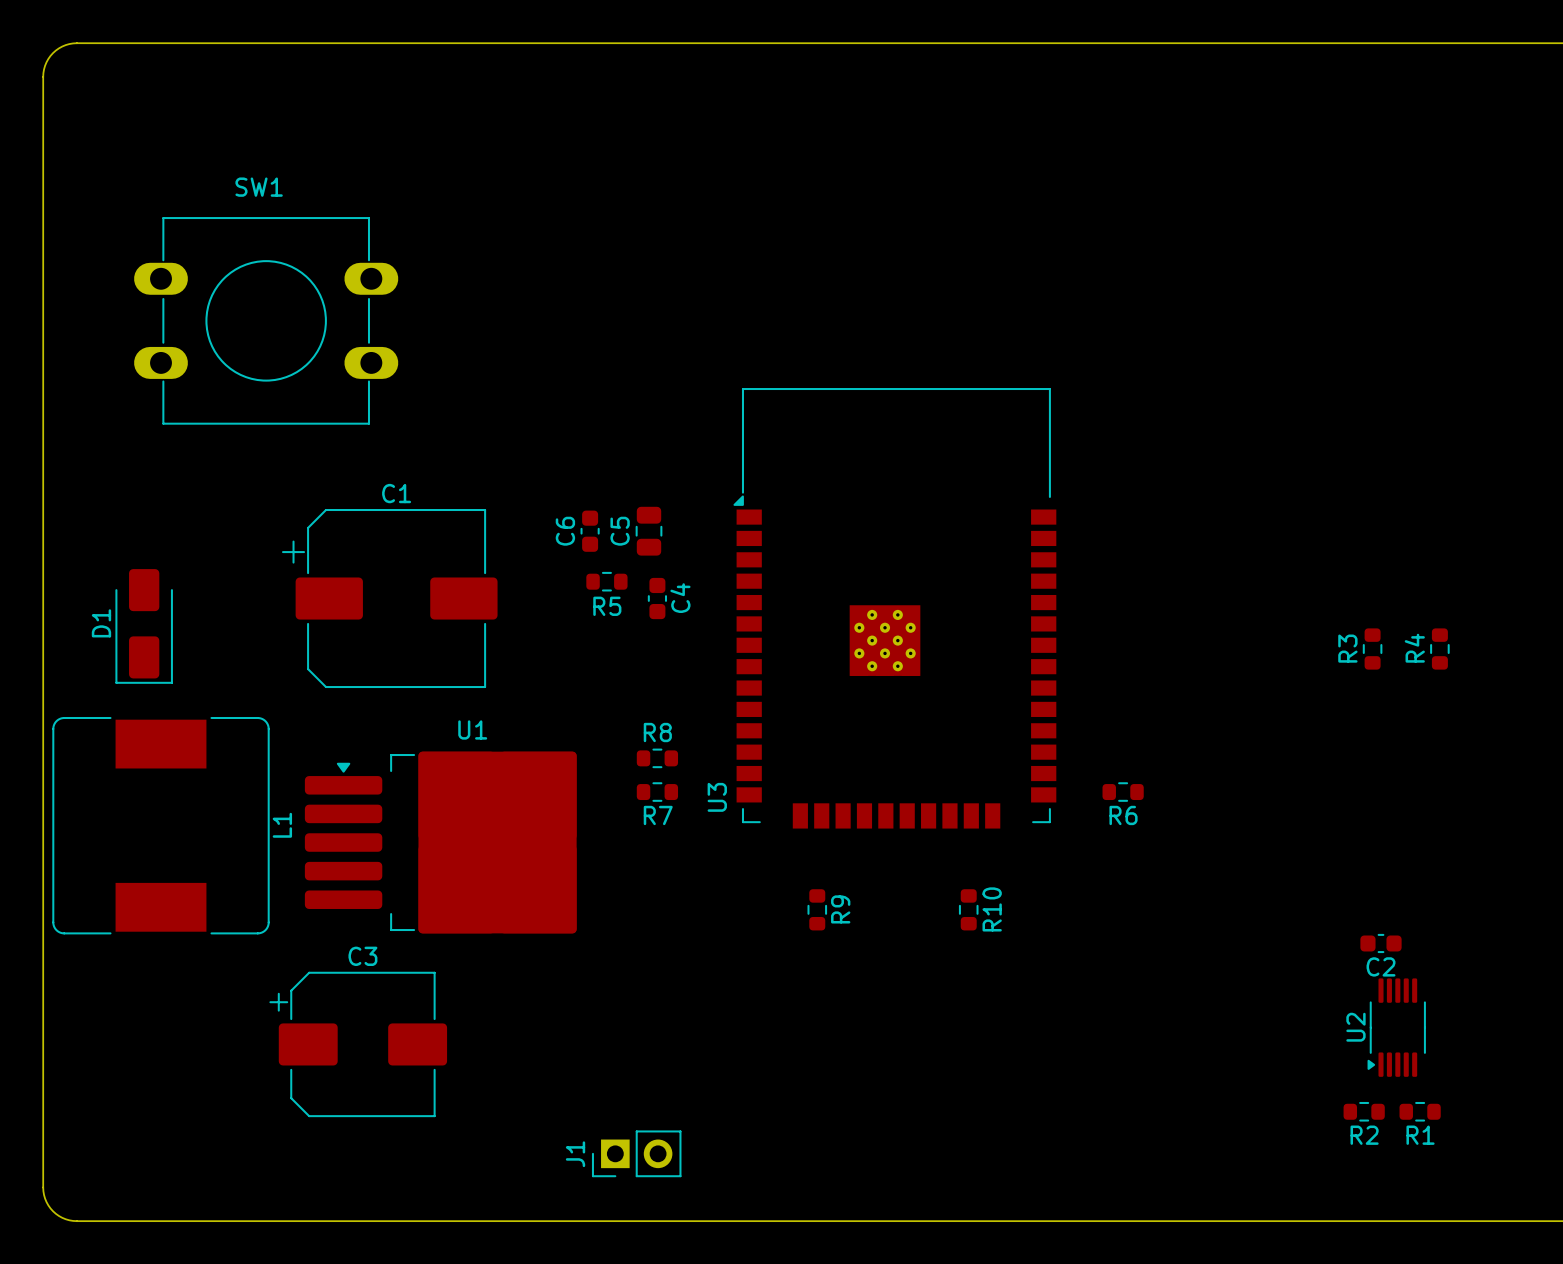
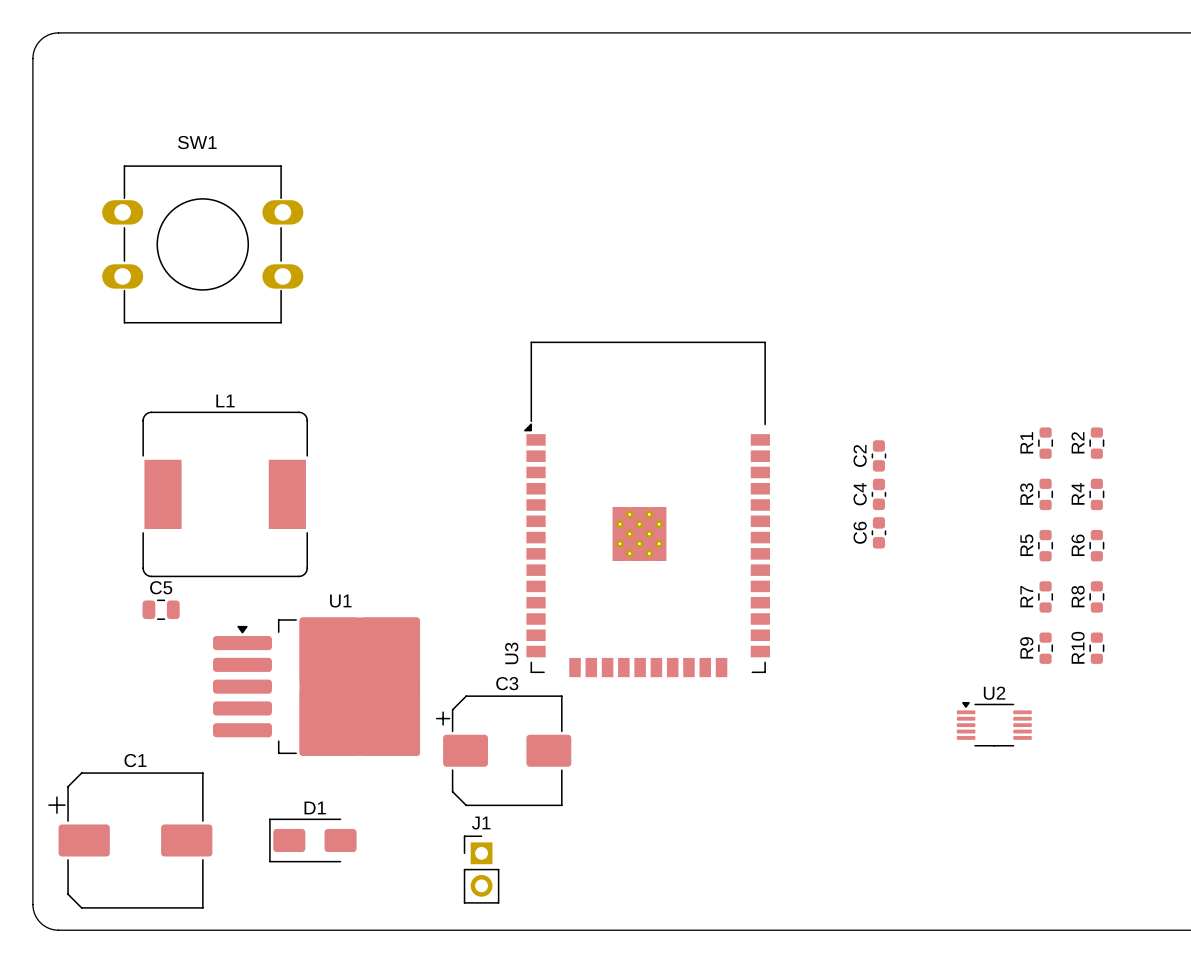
C6 position: (590, 531) -> (878, 532)
C5 rotation: 0° (649, 531) -> 90° clockwise (161, 609)
C5 position: (649, 531) -> (161, 609)
R5 rotation: 0° (606, 581) -> 90° clockwise (1045, 545)
R5 position: (606, 581) -> (1045, 545)
C1 position: (389, 598) -> (130, 840)
C4 position: (657, 598) -> (878, 494)
C4 name position: C4 (680, 598) -> C4 (860, 494)
U3 position: (894, 608) -> (647, 509)
D1 rotation: 0° (144, 626) -> 90° clockwise (312, 840)
D1 position: (144, 626) -> (312, 840)
R8 name position: R8 (657, 732) -> R8 (1078, 596)
R8 rotation: 0° (657, 758) -> 90° clockwise (1096, 596)
R8 position: (657, 758) -> (1096, 596)
R7 rotation: 0° (657, 792) -> 90° clockwise (1045, 596)
R7 position: (657, 792) -> (1045, 596)
R6 rotation: 0° (1123, 792) -> 90° clockwise (1096, 545)
R6 position: (1123, 792) -> (1096, 545)
L1 rotation: 0° (161, 825) -> 90° clockwise (225, 494)
L1 position: (161, 825) -> (225, 494)
L1 name position: L1 (282, 825) -> L1 (225, 400)
U1 position: (440, 842) -> (316, 686)
R9 position: (817, 909) -> (1045, 648)
R9 name position: R9 (840, 909) -> R9 (1026, 647)
R10 position: (968, 909) -> (1096, 648)
R10 name position: R10 (992, 909) -> R10 (1078, 647)
C2 rotation: 0° (1381, 943) -> 90° clockwise (878, 455)
C2 position: (1381, 943) -> (878, 455)
U2 rotation: 0° (1396, 1027) -> 90° clockwise (994, 724)
U2 position: (1396, 1027) -> (994, 724)
C3 position: (358, 1044) -> (503, 750)
R2 rotation: 0° (1364, 1111) -> 90° clockwise (1096, 443)
R2 position: (1364, 1111) -> (1096, 443)
R1 rotation: 0° (1420, 1111) -> 90° clockwise (1045, 443)
R1 position: (1420, 1111) -> (1045, 443)
J1 rotation: 0° (636, 1153) -> 90° clockwise (481, 869)

